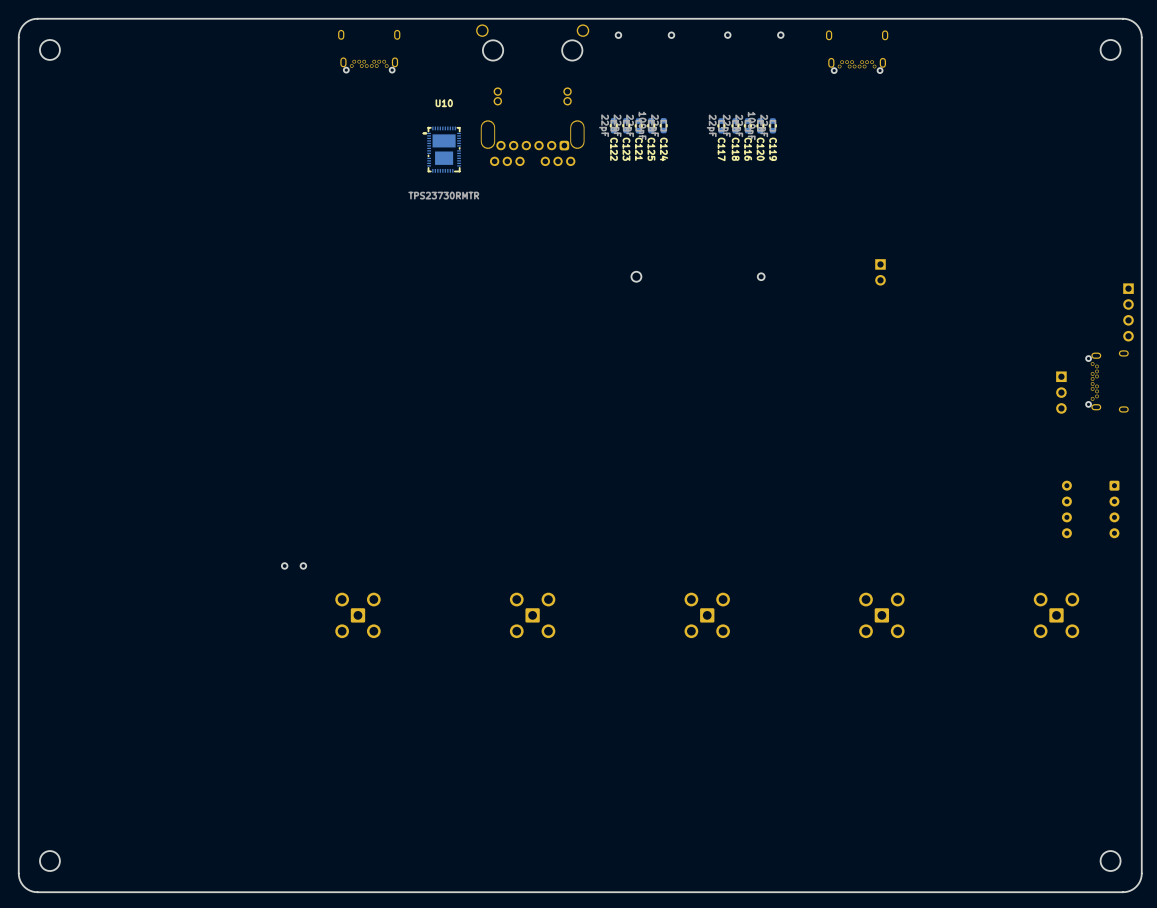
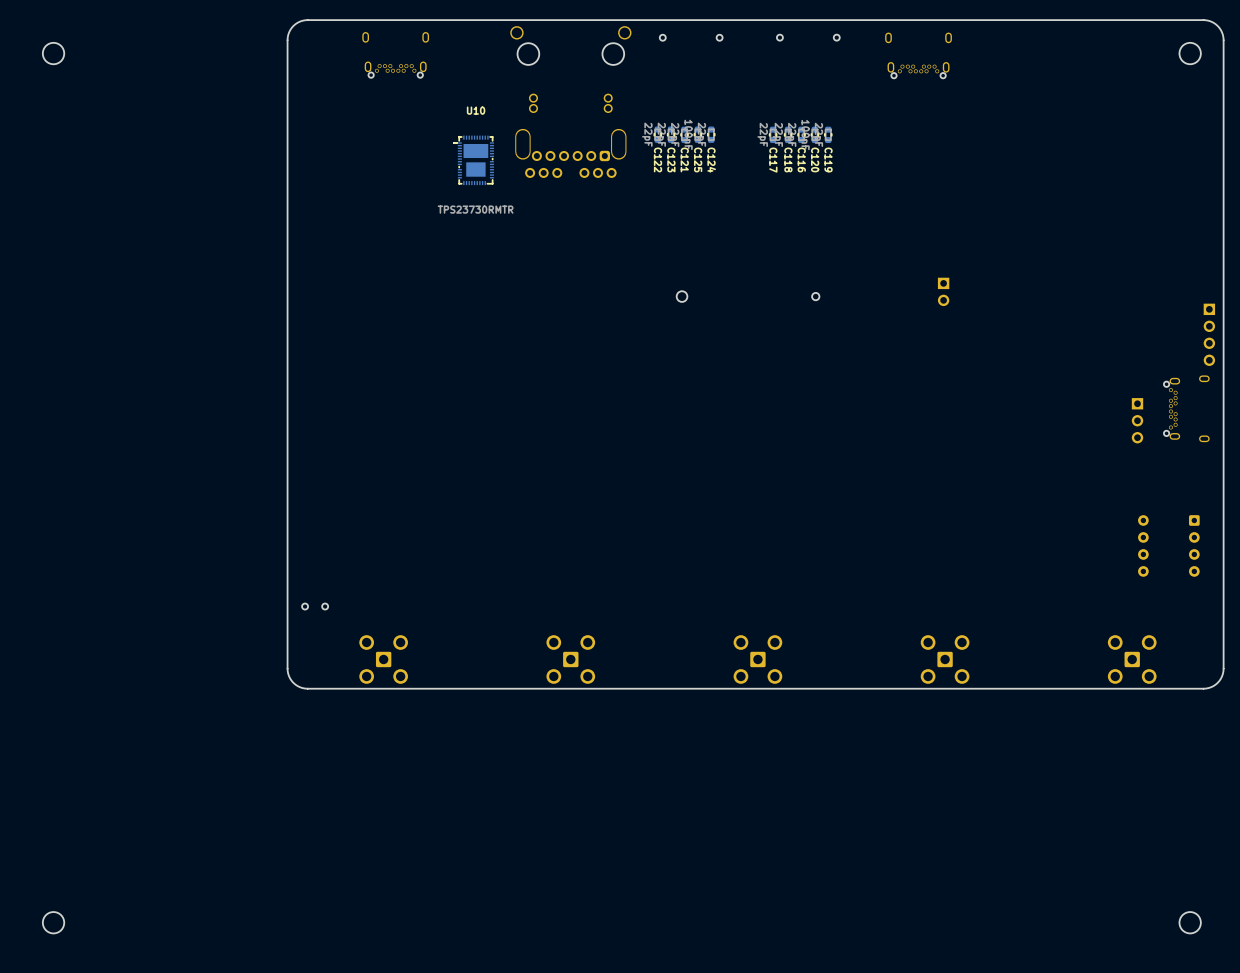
board edge: (287, 18) (37, 18) (26, 22) (19, 32) (18, 873) (21, 882) (26, 888) (37, 892) (1127, 891) (1137, 884) (1141, 873) (1141, 623) -> (307, 20) (299, 21) (293, 25) (289, 32) (287, 40) (287, 668) (290, 678) (295, 684) (307, 688) (1203, 688) (1211, 687) (1217, 682) (1222, 676) (1223, 668)

